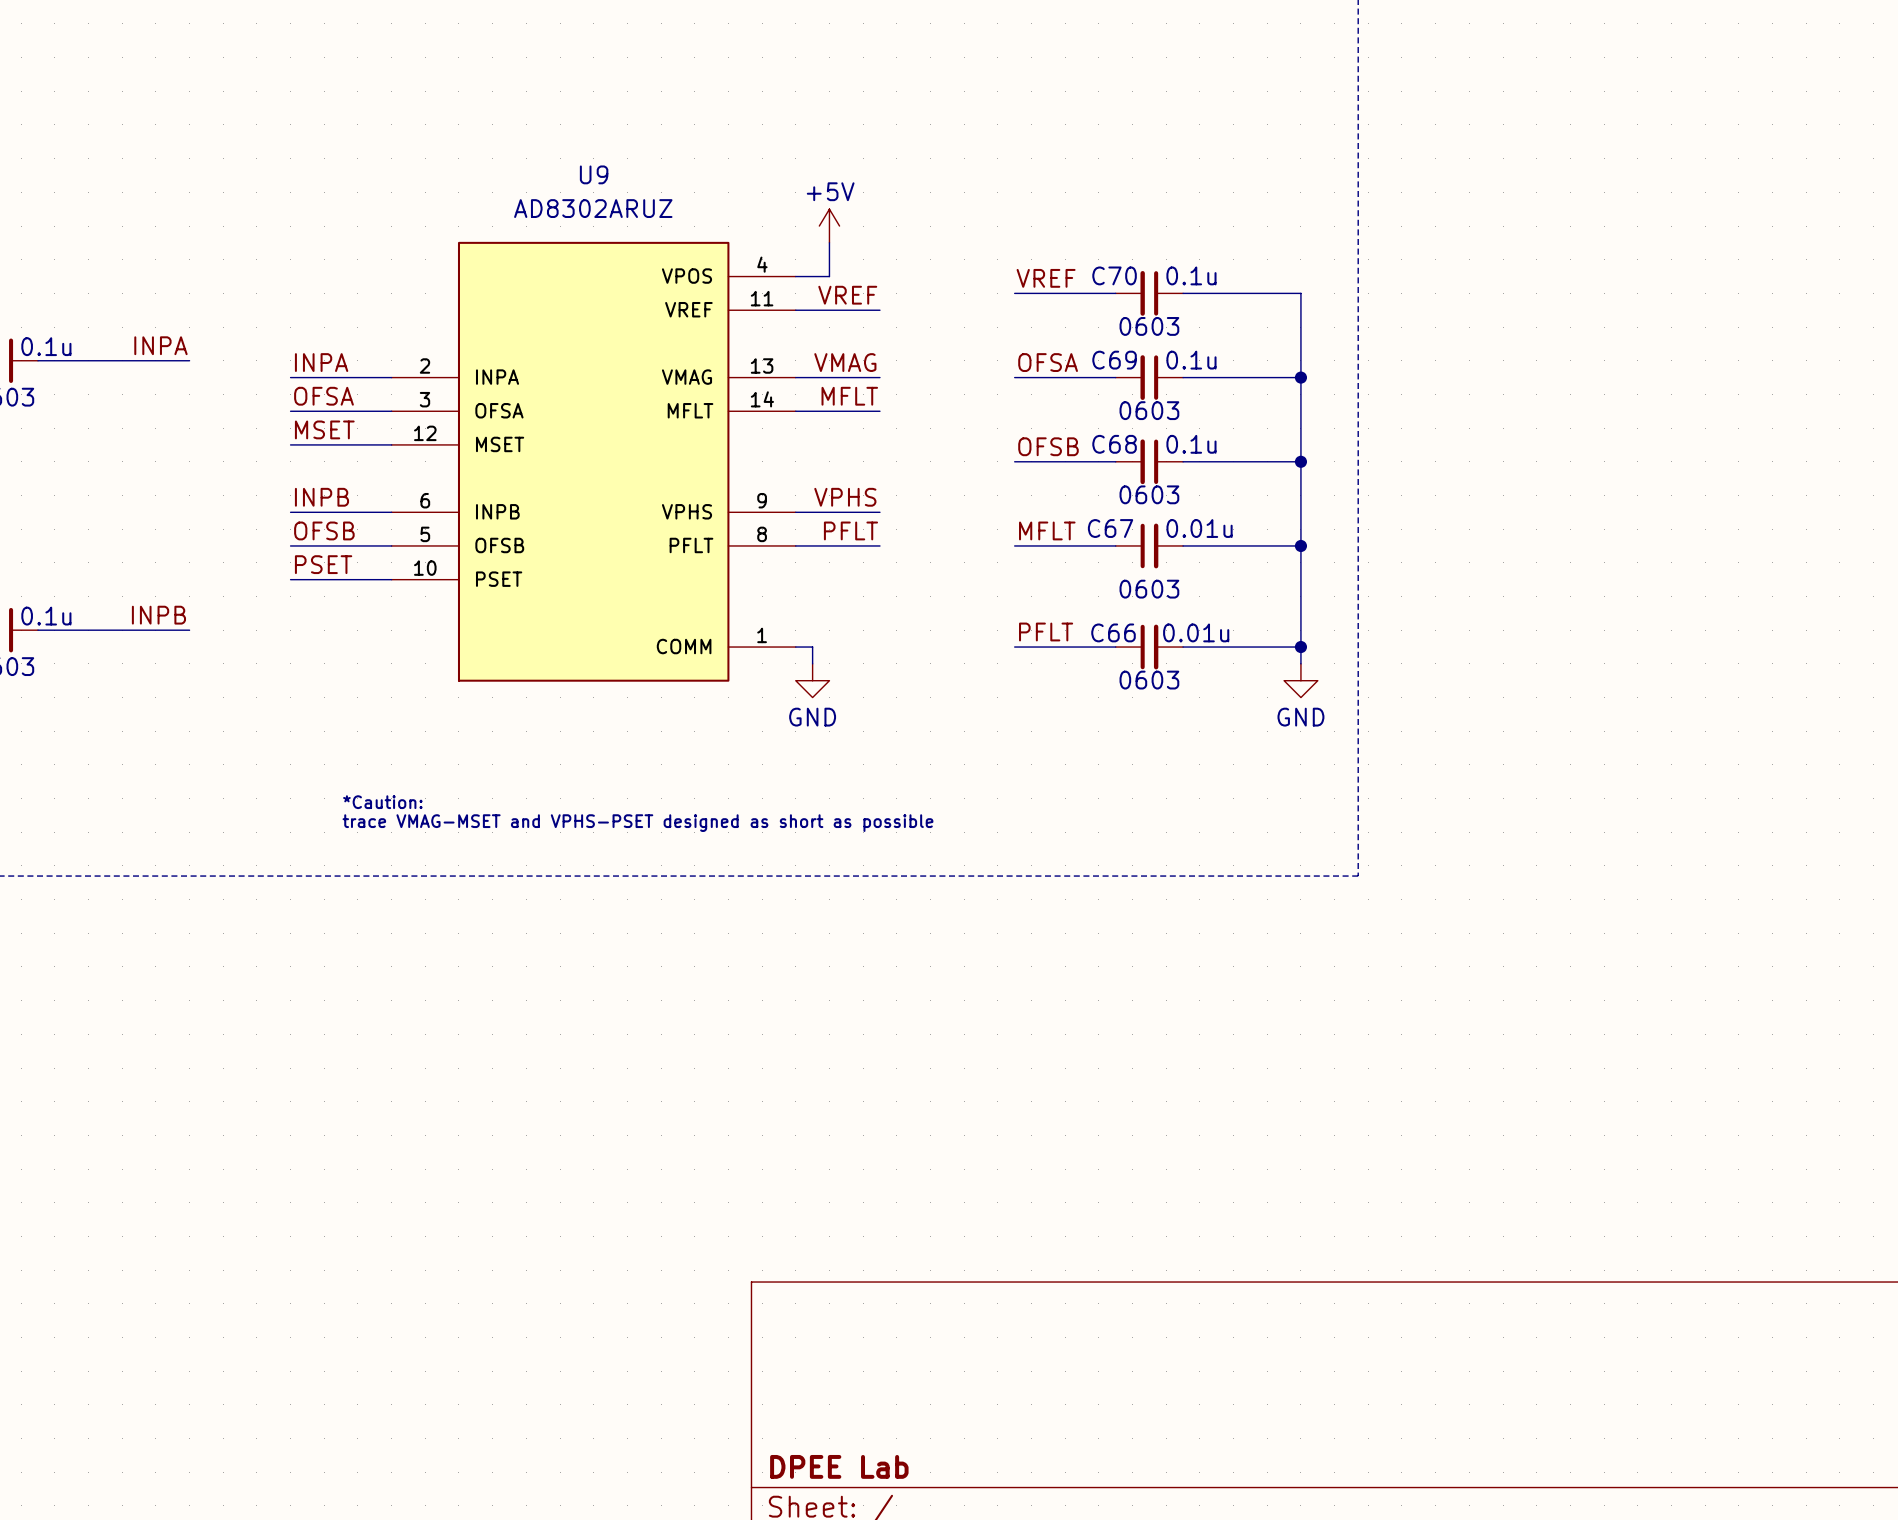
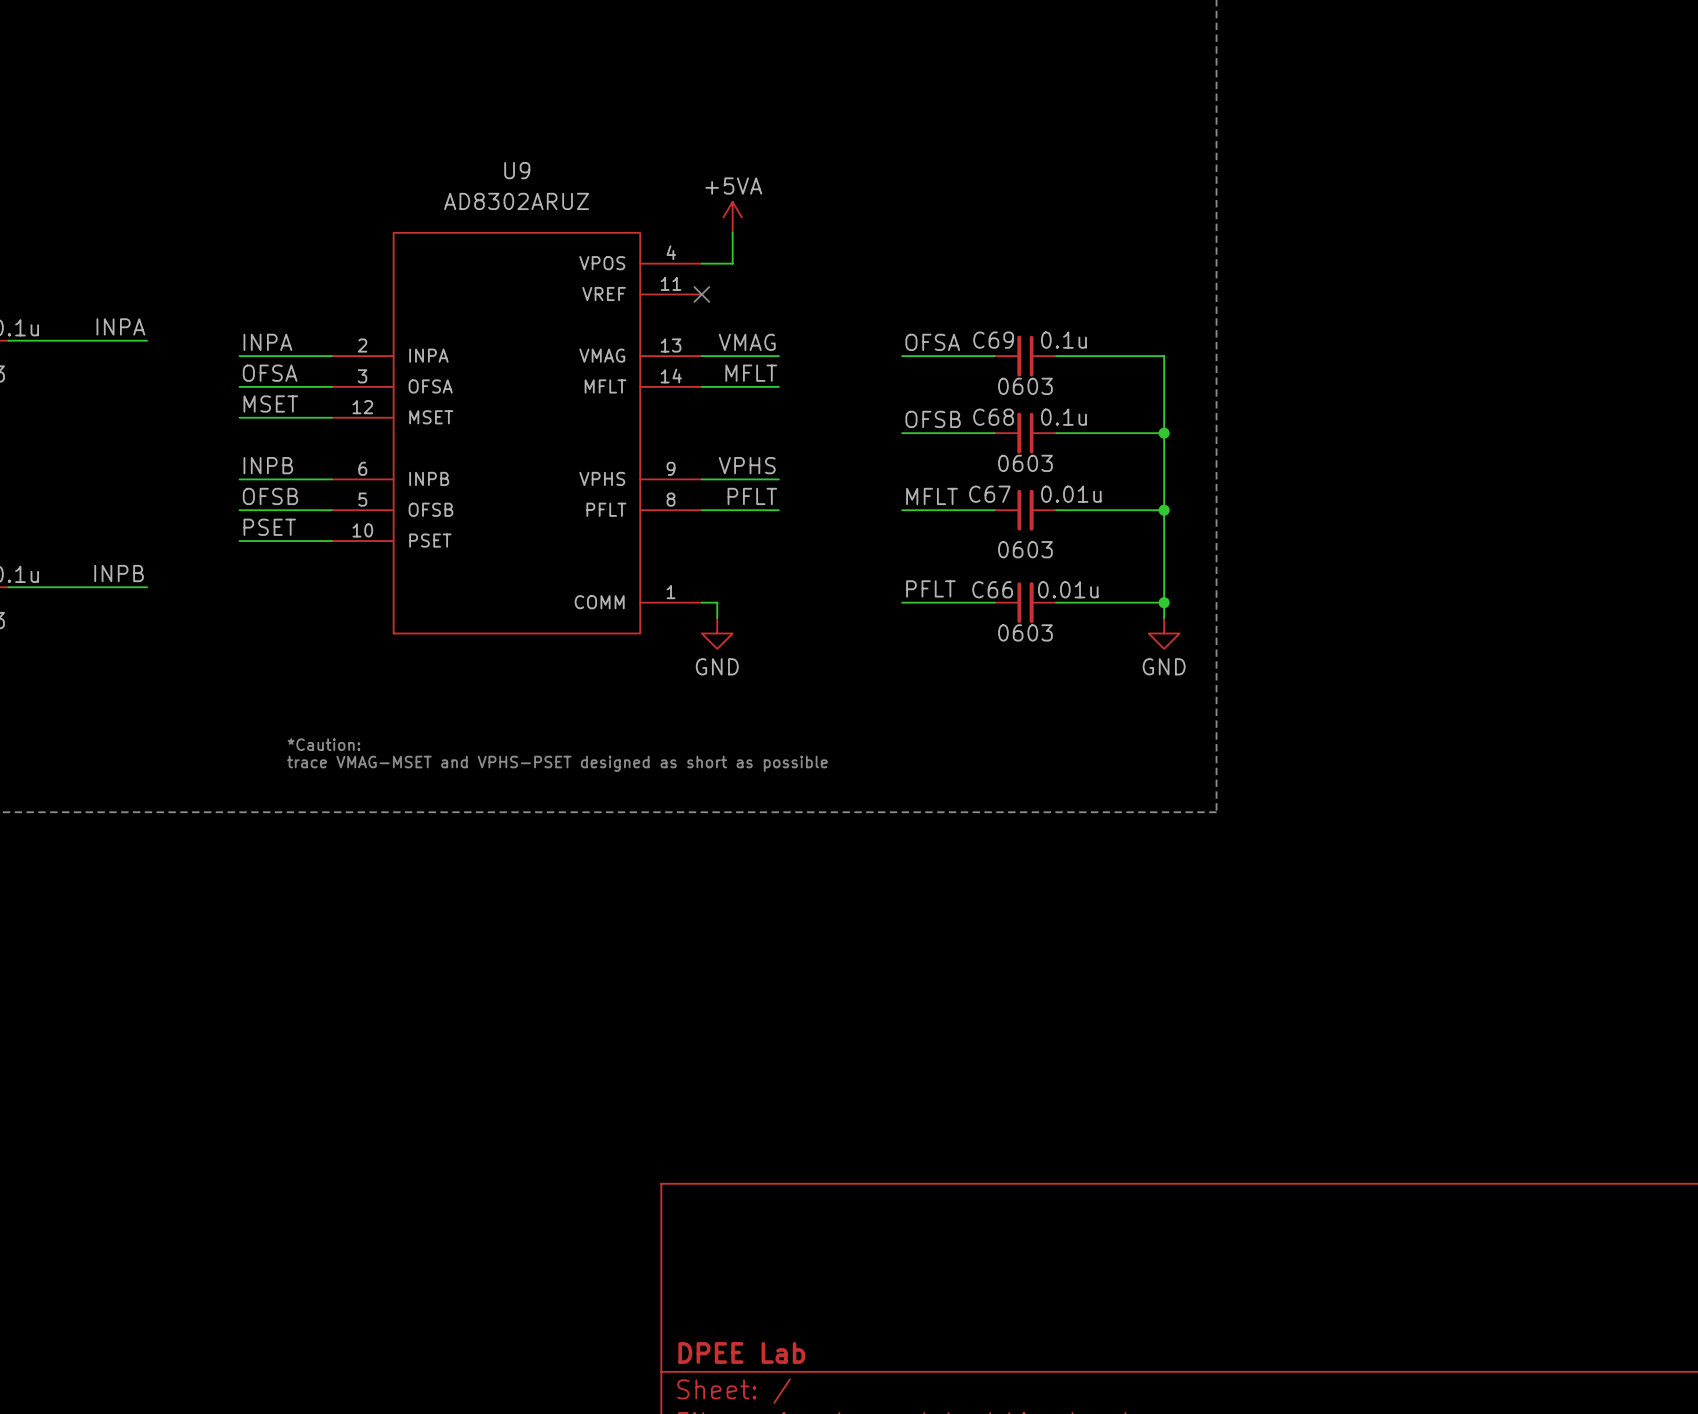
power symbol: +5V (829, 226) -> +5VA (732, 217)
label: VREF (1046, 278) -> none
wire: (1014, 293) (1115, 293) -> none
C70: 0.1u (1149, 293) -> none
wire: (1183, 293) (1300, 293) (1300, 377) -> none
label: VREF (847, 295) -> none
wire: (795, 310) (879, 310) -> none
no-connect mark: none -> (701, 294)
junction: (1300, 377) -> none

